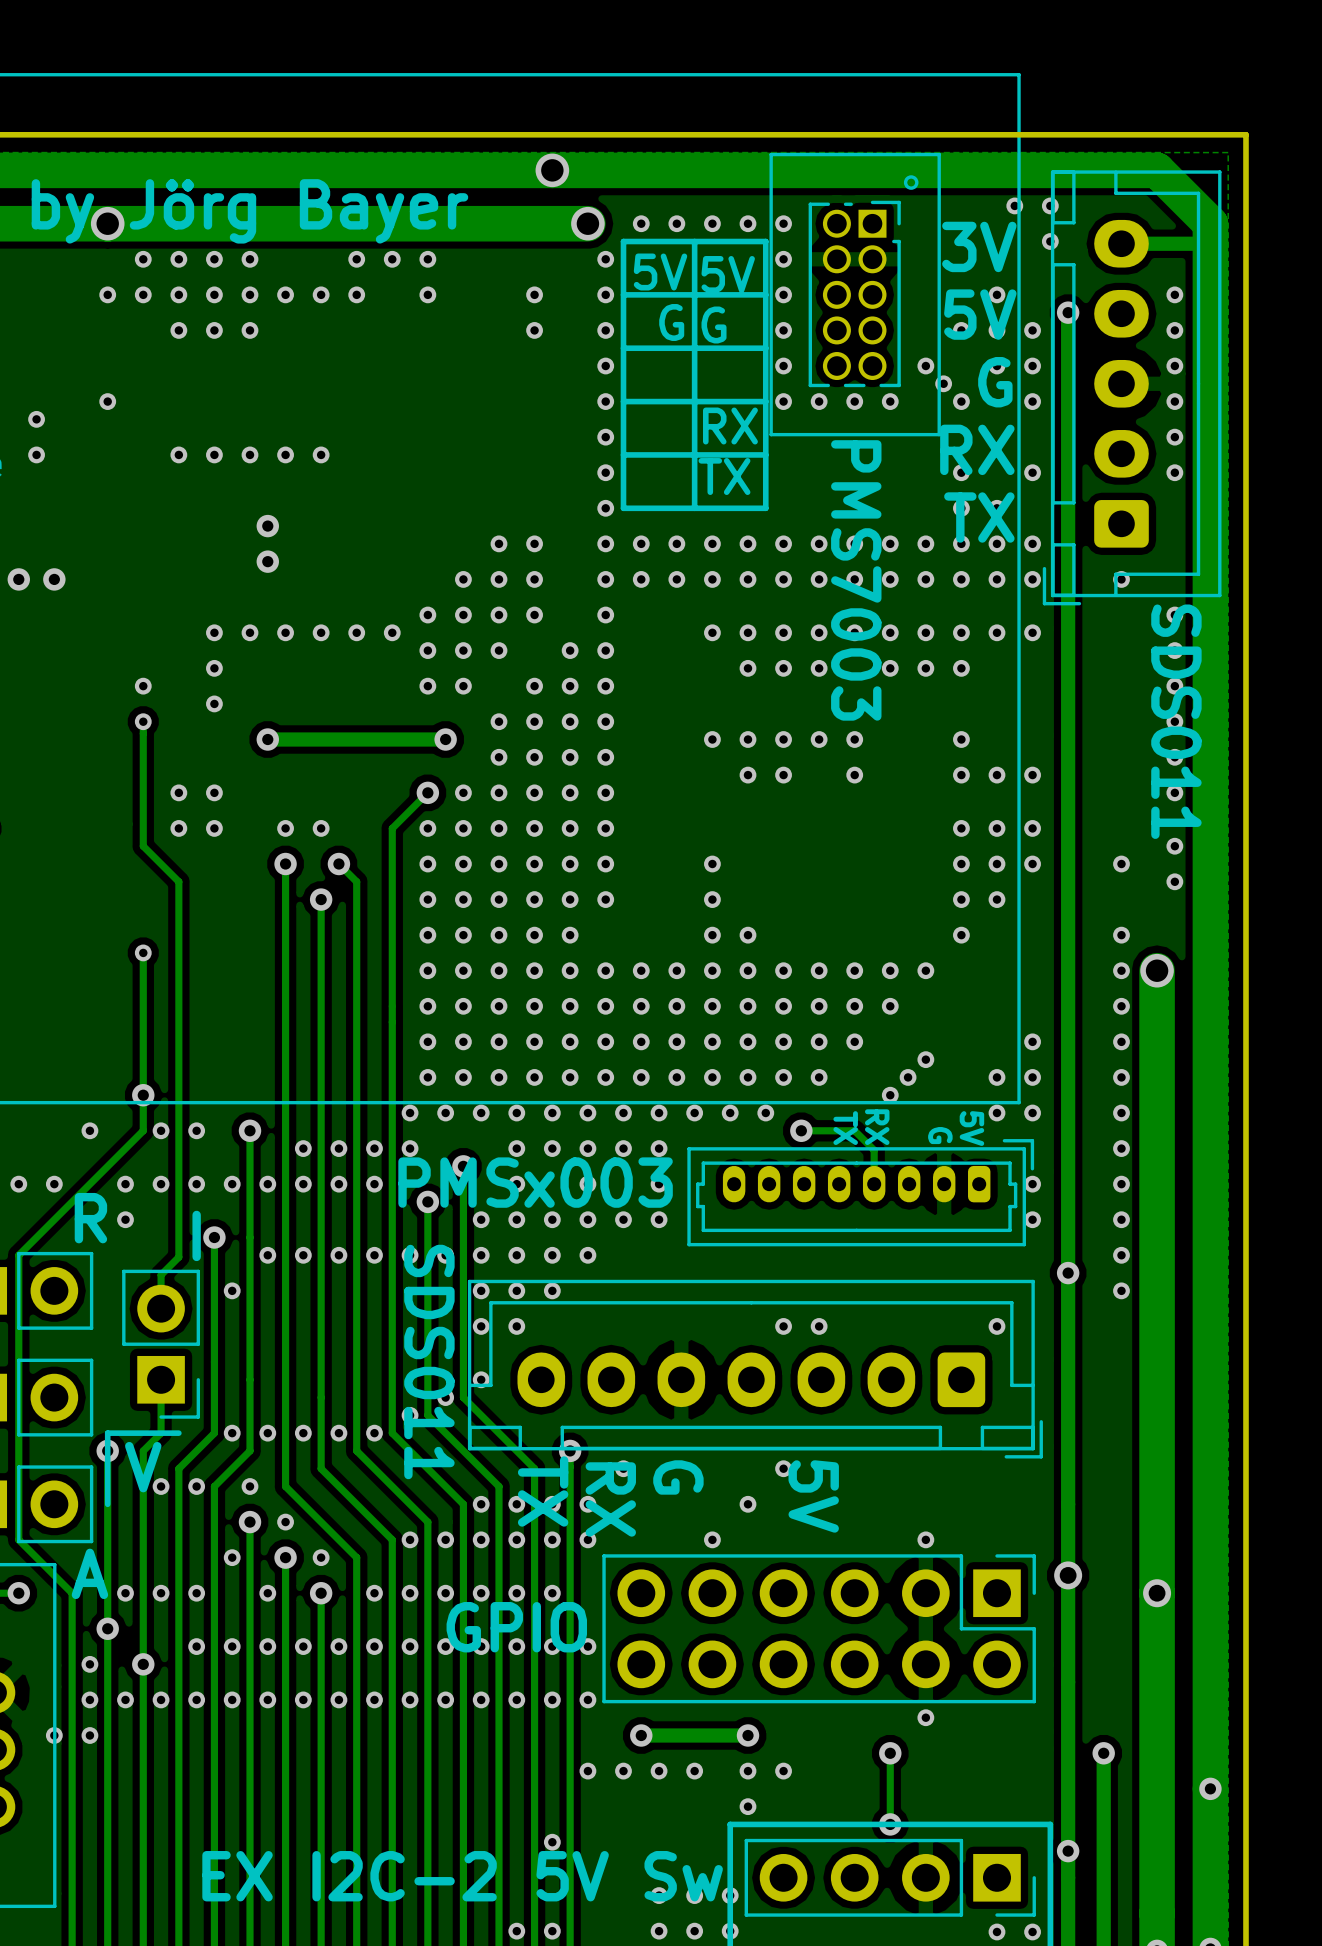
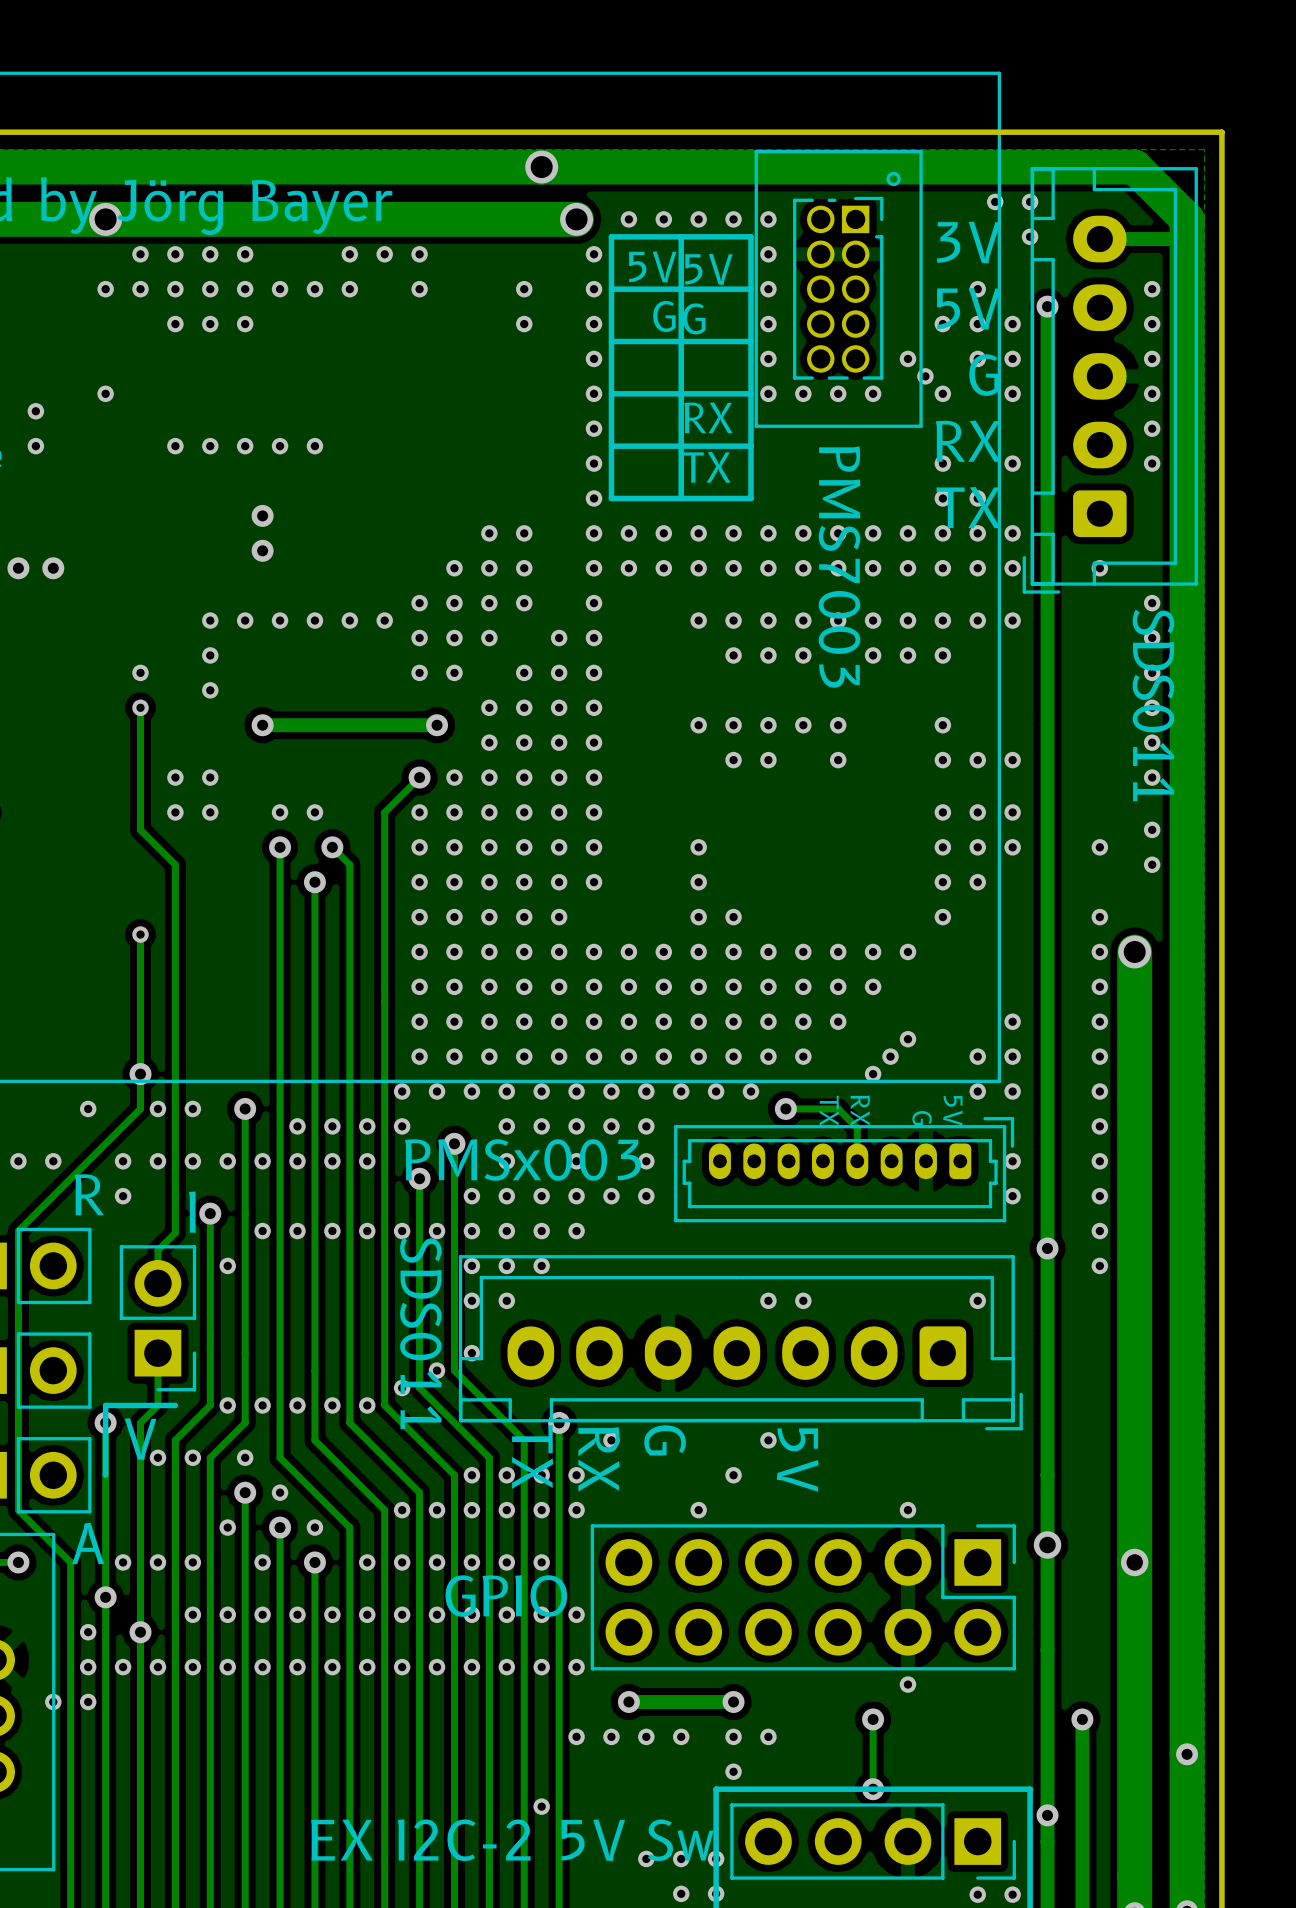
via: (516, 1931) -> none
via: (552, 1931) -> none
via: (659, 1931) -> none

